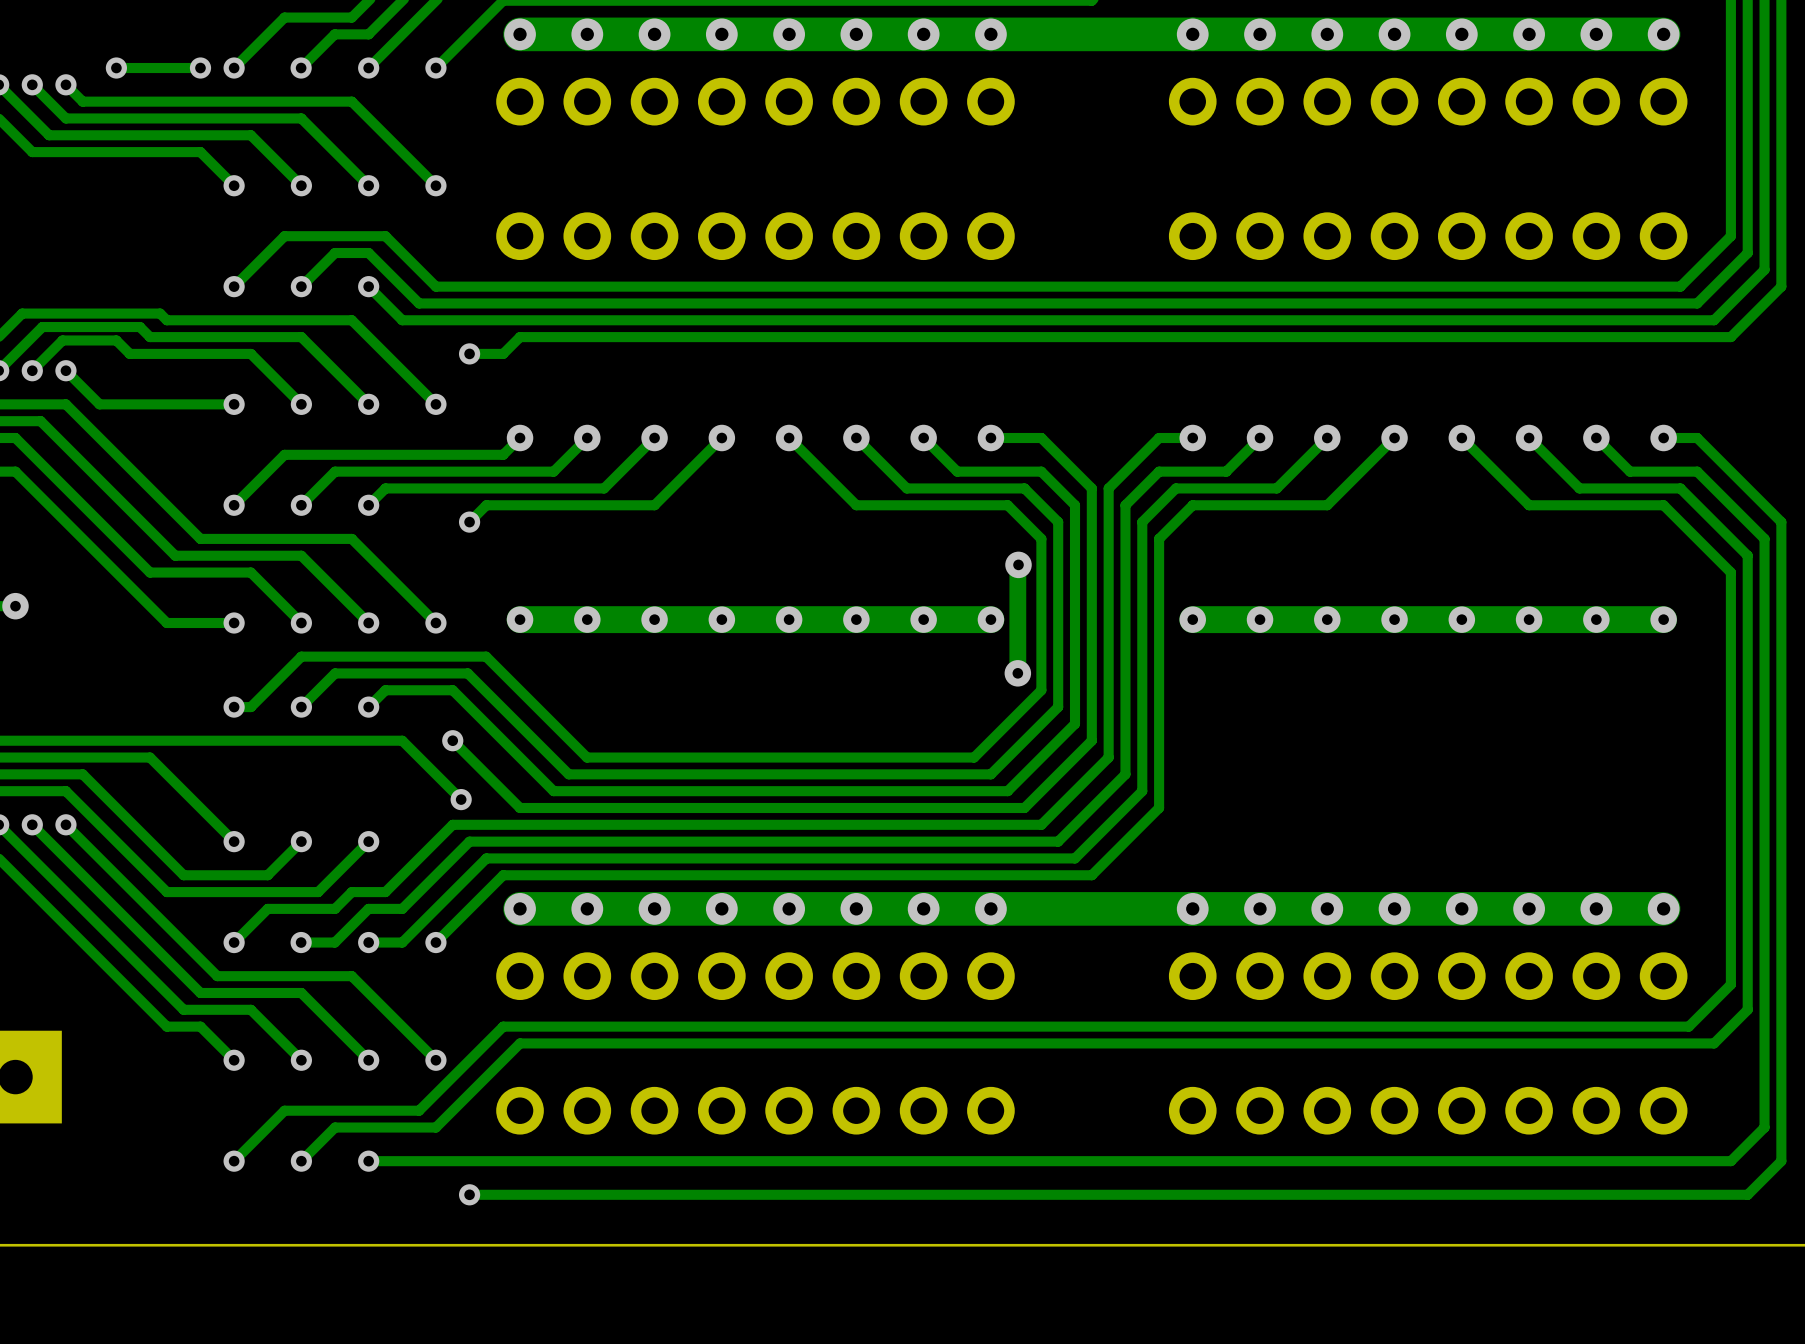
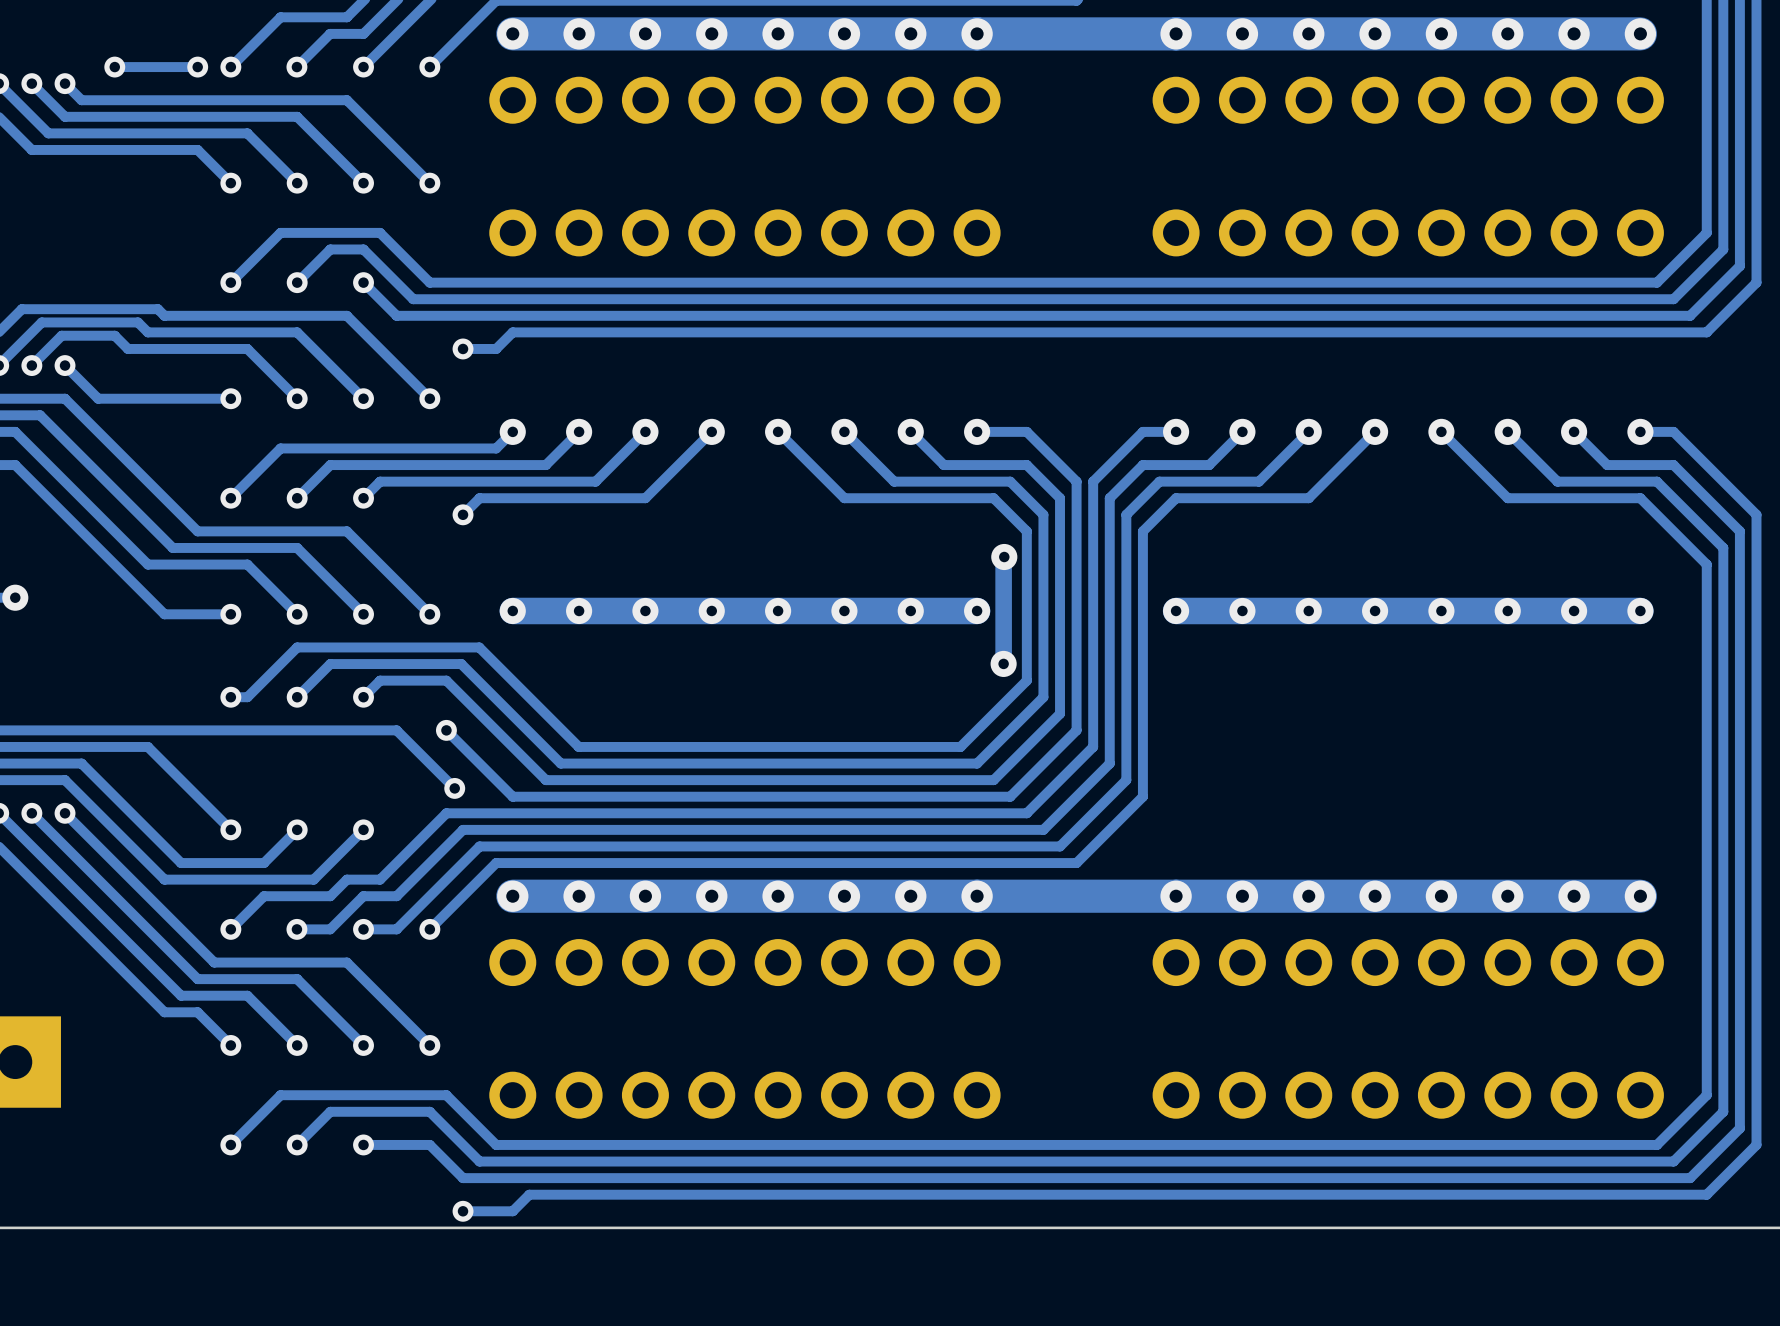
track: (1730, 984) (1688, 1026) (503, 1026) (419, 1110) -> (496, 1144) (446, 1095) (413, 1095)
track: none -> (1706, 970) (1706, 1095) (1657, 1144)
track: (1747, 1009) (1714, 1043) (520, 1043) (435, 1127) -> (1723, 995) (1723, 1111) (1673, 1161) (479, 1161) (429, 1111)
track: (1764, 1127) (1730, 1161) (1680, 1161) -> (1739, 1111) (1739, 1128) (1690, 1178)
track: (503, 1161) (435, 1161) -> (463, 1178) (429, 1144)
via position: (469, 1194) -> (463, 1211)
track: (1747, 1194) (1714, 1194) -> (1723, 1178) (1706, 1194) (529, 1194) (512, 1211) (463, 1211)

